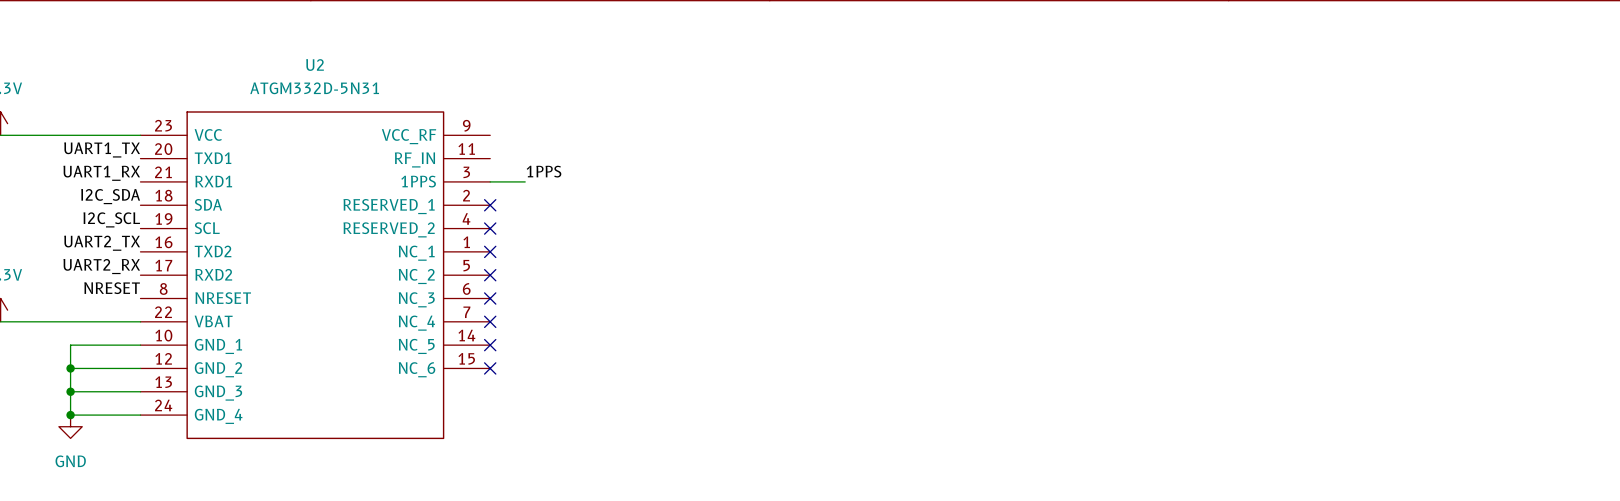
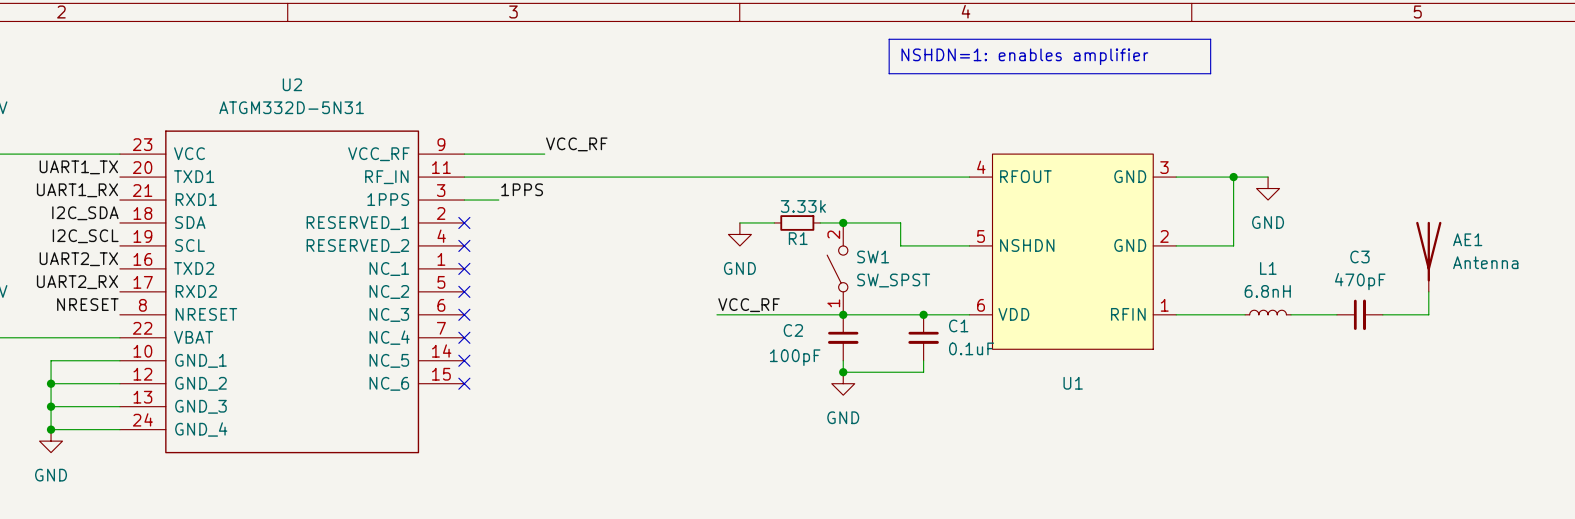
line: none -> (889, 39) (1210, 39) (1210, 73) (889, 73) (889, 39)
text: none -> NSHDN=1: enables amplifier (1024, 56)
label: none -> VCC_RF (576, 144)
wire: none -> (464, 154) (544, 154)
wire: none -> (464, 177) (969, 177)
wire: none -> (1176, 177) (1268, 177)
wire: none -> (1233, 177) (1233, 245) (1176, 245)
junction: none -> (1233, 177)
power symbol: none -> GND (1268, 188)
wire: none -> (739, 222) (774, 222)
R1: none -> 3.33k (797, 222)
wire: none -> (820, 222) (900, 222) (900, 245) (969, 245)
junction: none -> (843, 222)
power symbol: none -> GND (739, 234)
U1: none -> (1072, 251)
AE1: none -> Antenna (1428, 256)
SW1: none -> SW_SPST (837, 268)
wire: none -> (1428, 291) (1428, 314) (1382, 314)
label: none -> VCC_RF (749, 305)
L1: none -> 6.8nH (1268, 312)
wire: none -> (716, 314) (969, 314)
junction: none -> (843, 314)
junction: none -> (923, 314)
wire: none -> (1176, 314) (1245, 314)
wire: none -> (1291, 314) (1336, 314)
C3: none -> 470pF (1359, 314)
C2: none -> 100pF (843, 337)
C1: none -> 0.1uF (923, 337)
wire: none -> (843, 360) (843, 372) (923, 372) (923, 360)
junction: none -> (843, 372)
power symbol: none -> GND (843, 383)

